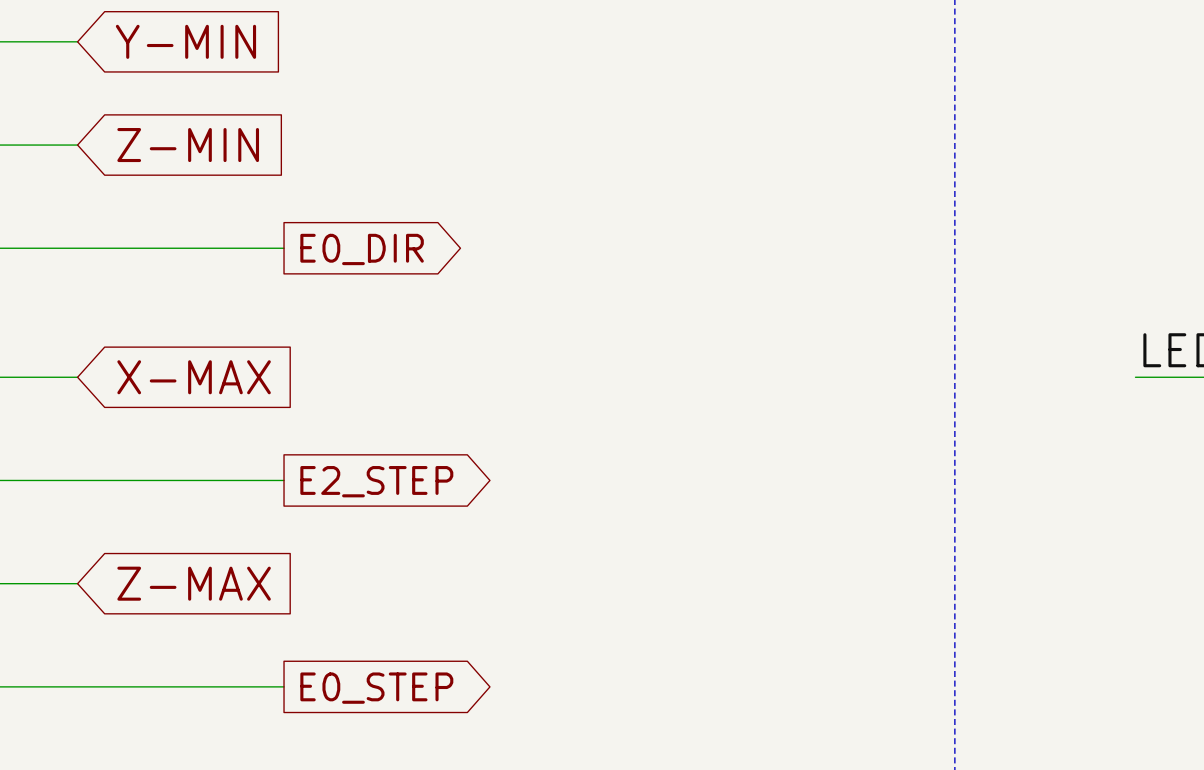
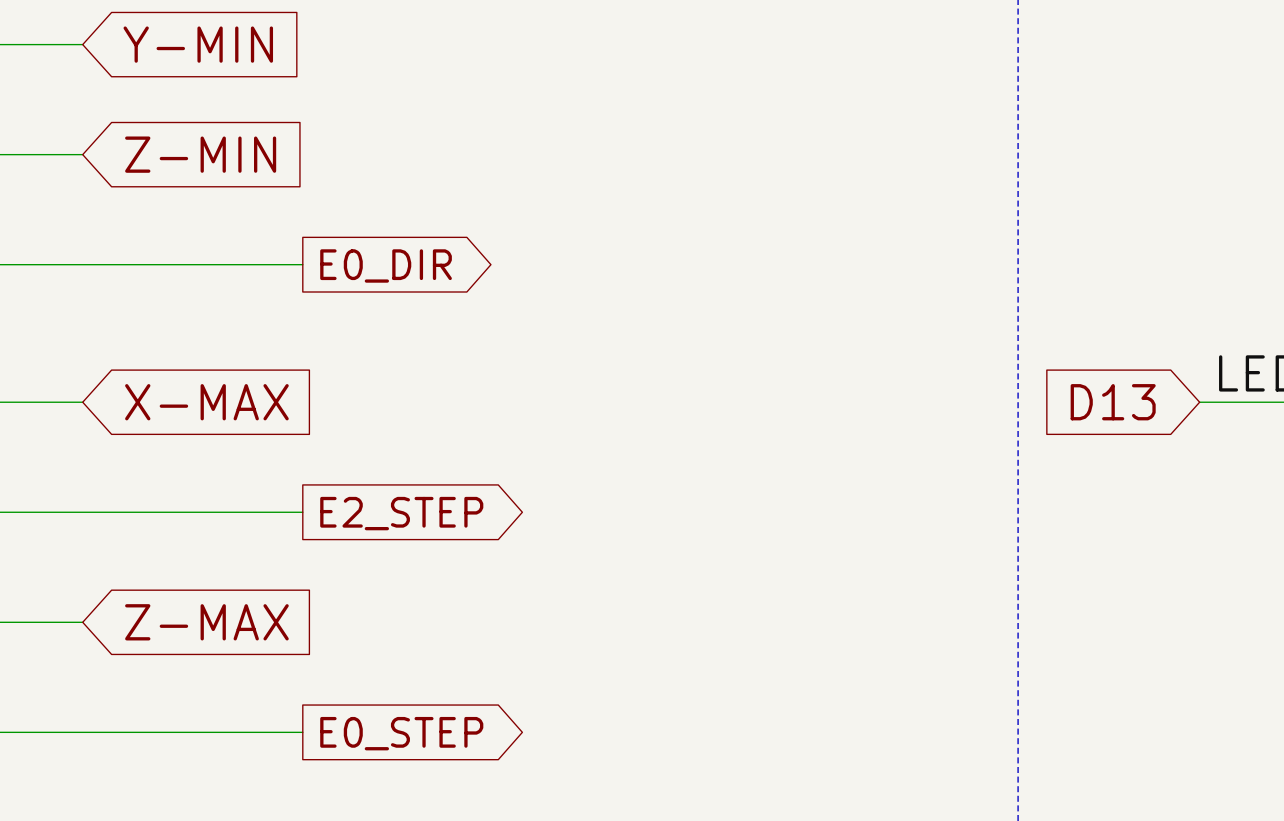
global label: none -> D13 (1113, 402)
wire: none -> (1199, 402) (1210, 402)

